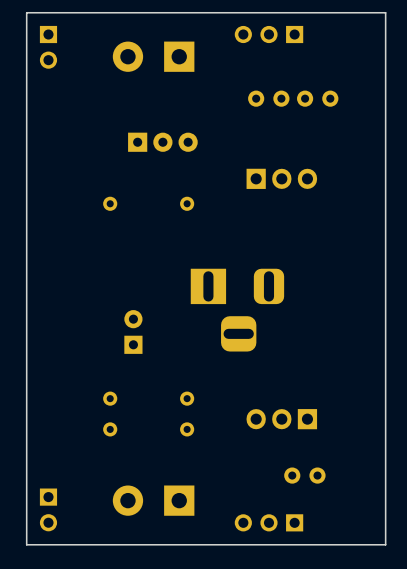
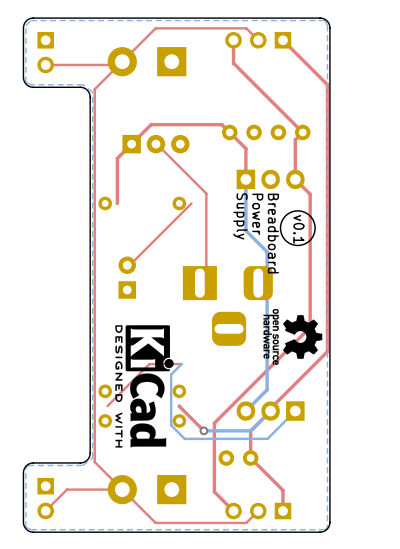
bottom zone outline: none -> (324, 20) (327, 25) (327, 527) (324, 529) (30, 529) (25, 527) (25, 467) (28, 465) (82, 465) (92, 458) (92, 92) (82, 84) (30, 84) (25, 82) (25, 25) (30, 20) (324, 20)
top track: none -> (233, 40) (233, 63) (302, 132) (295, 139) (295, 179) (310, 194) (310, 327) (214, 423) (214, 491) (233, 511)
top track: none -> (258, 40) (246, 28) (155, 28) (94, 89) (94, 462) (155, 522) (246, 522) (258, 511)
top track: none -> (282, 40) (327, 84) (327, 351) (250, 431) (250, 458) (282, 490) (282, 511)
top track: none -> (119, 64) (45, 64)
part: (268, 98) -> none
part: (317, 98) -> none
part: none -> (241, 132)
part: none -> (290, 132)
top track: none -> (155, 144) (206, 193) (206, 266) (189, 283)
top track: none -> (245, 179) (245, 148) (221, 124) (151, 124) (117, 158) (117, 203)
bottom track: none -> (245, 179) (245, 230) (267, 251) (267, 389) (245, 411)
top track: none -> (191, 203) (129, 265) (127, 265)
drawing: none -> [279, 210, 316, 247]
text: none -> Power (257, 214)
text: none -> Supply (240, 216)
text: none -> v0.1 (298, 229)
text: none -> Breadboard (273, 233)
drawing: none -> [263, 308, 323, 366]
drawing: none -> [115, 325, 174, 448]
part position: (133, 331) -> (127, 277)
top track: none -> (181, 364) (149, 364) (107, 406)
bottom track: none -> (181, 364) (171, 374) (171, 425) (184, 438) (267, 438) (295, 411)
top track: none -> (179, 406) (203, 430)
bottom track: none -> (270, 411) (250, 430) (203, 430)
via: none -> (203, 430)
part position: (304, 475) -> (238, 458)
top track: none -> (122, 489) (67, 489) (45, 510)
board edge: (333, 544) (385, 544) (385, 12) (26, 12) (26, 544) (35, 544) -> (320, 532) (327, 529) (329, 522) (329, 27) (327, 20) (320, 18) (33, 18) (24, 23) (23, 77) (26, 84) (33, 87) (82, 87) (88, 91) (90, 97) (90, 454) (87, 460) (81, 462) (32, 463) (25, 466) (23, 472) (23, 523) (27, 530) (33, 532)

